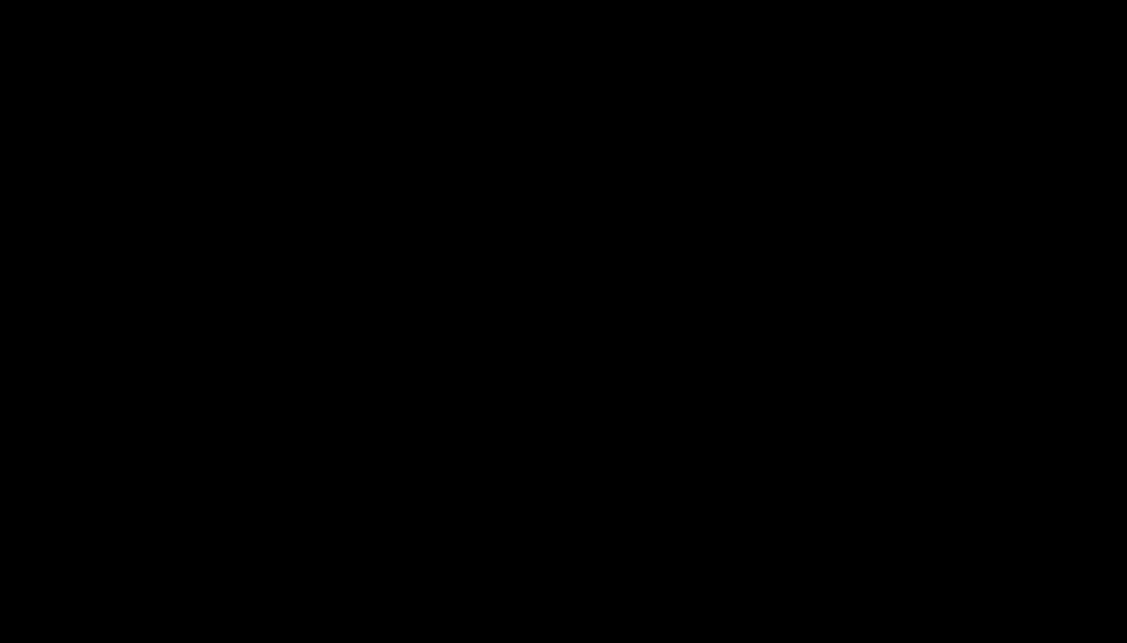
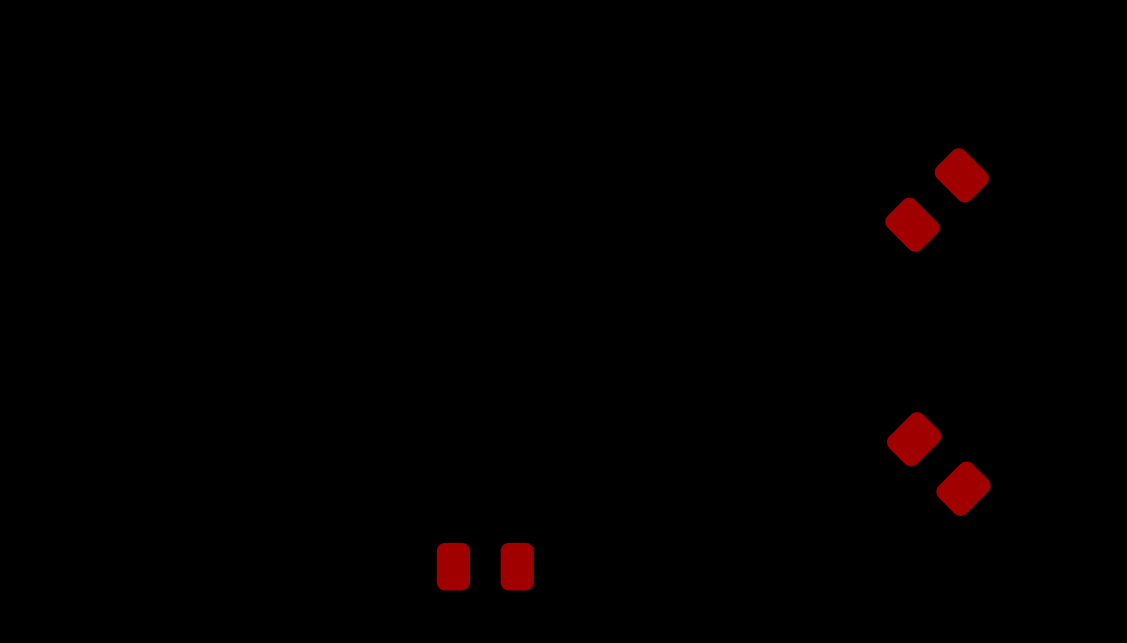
part: none -> (937, 200)
part: none -> (938, 463)
part: none -> (485, 566)

